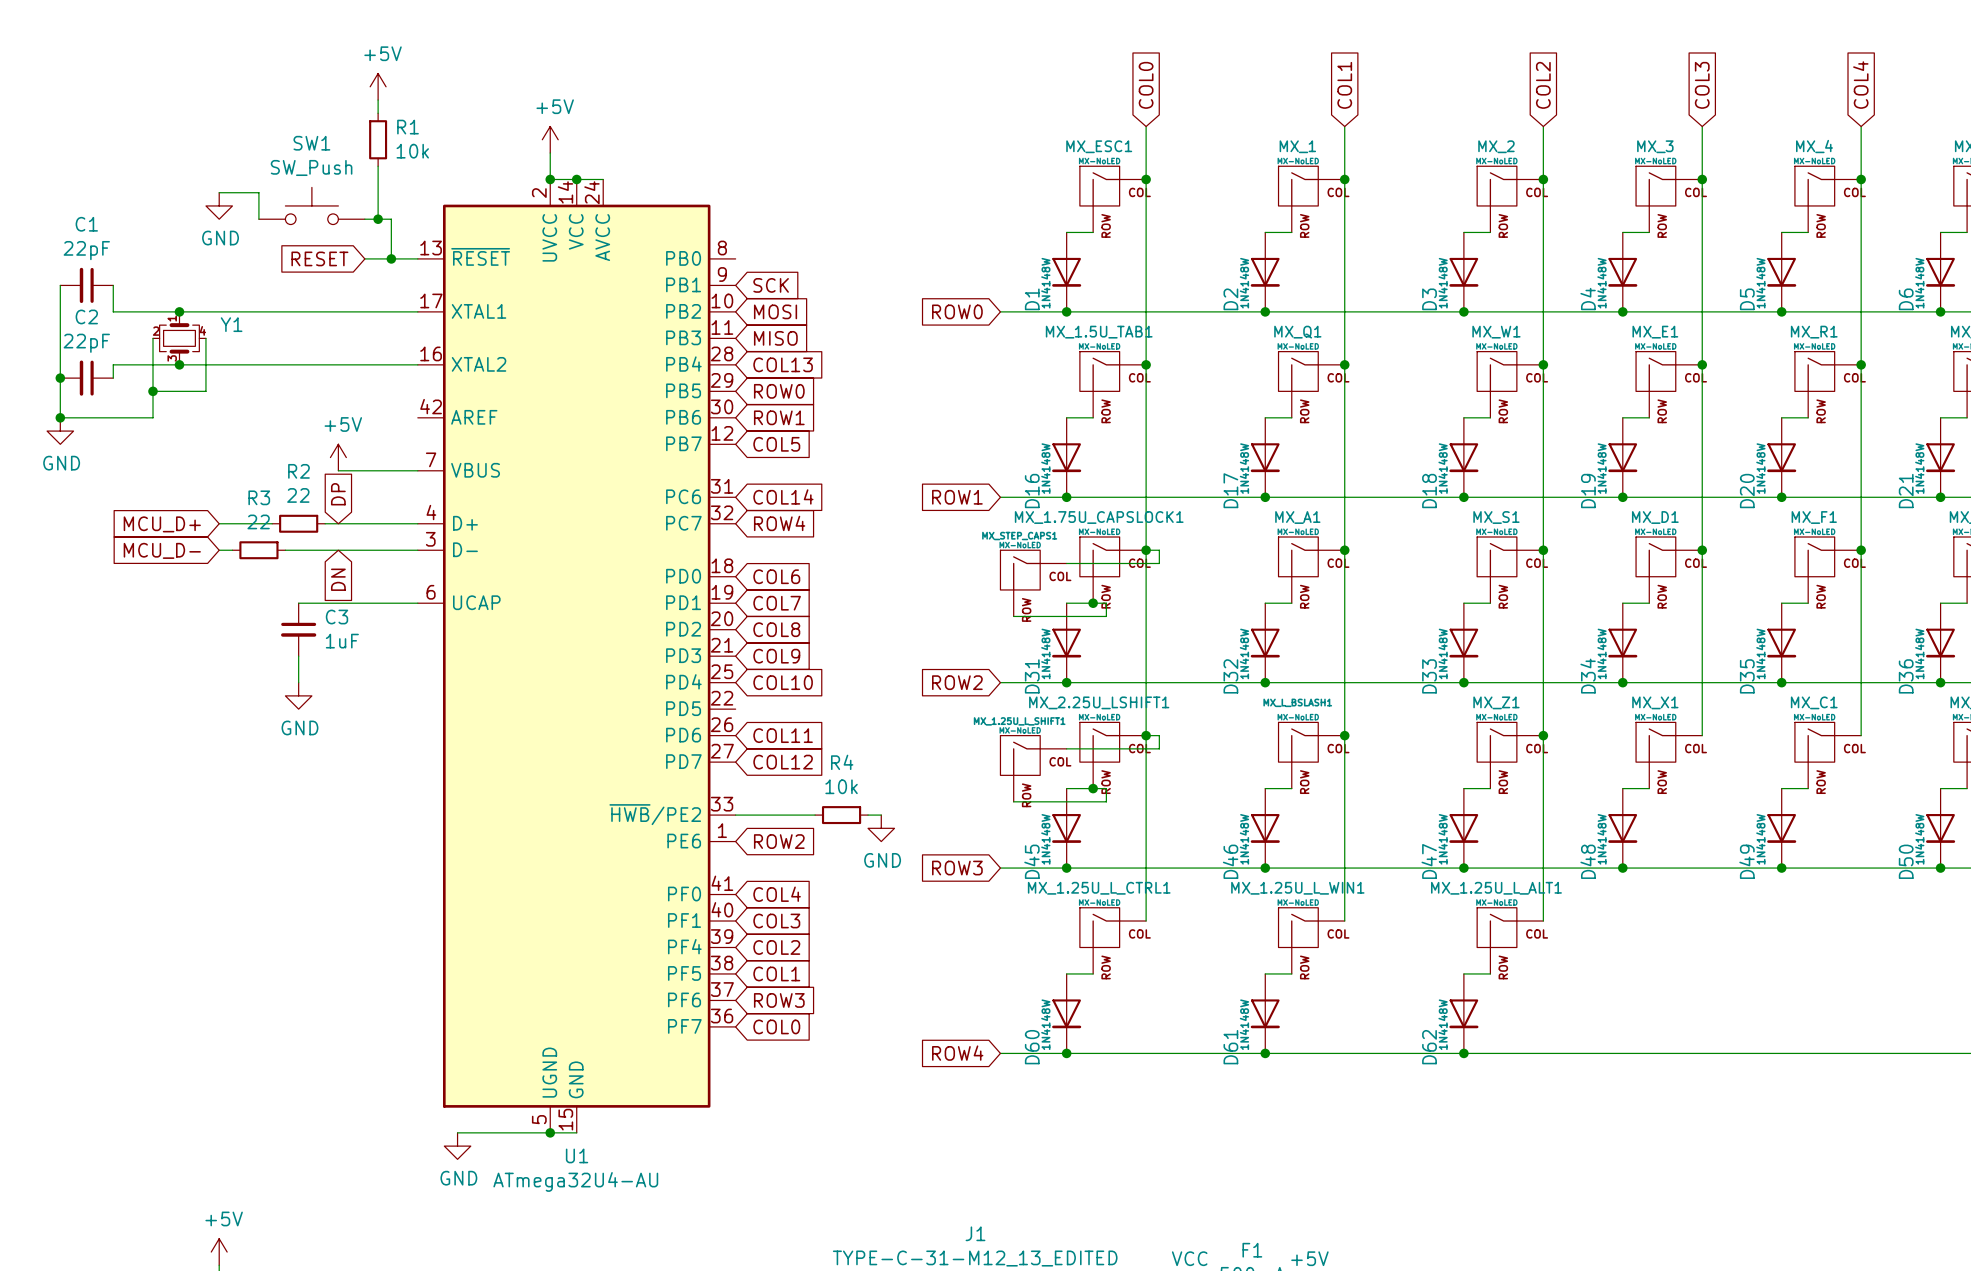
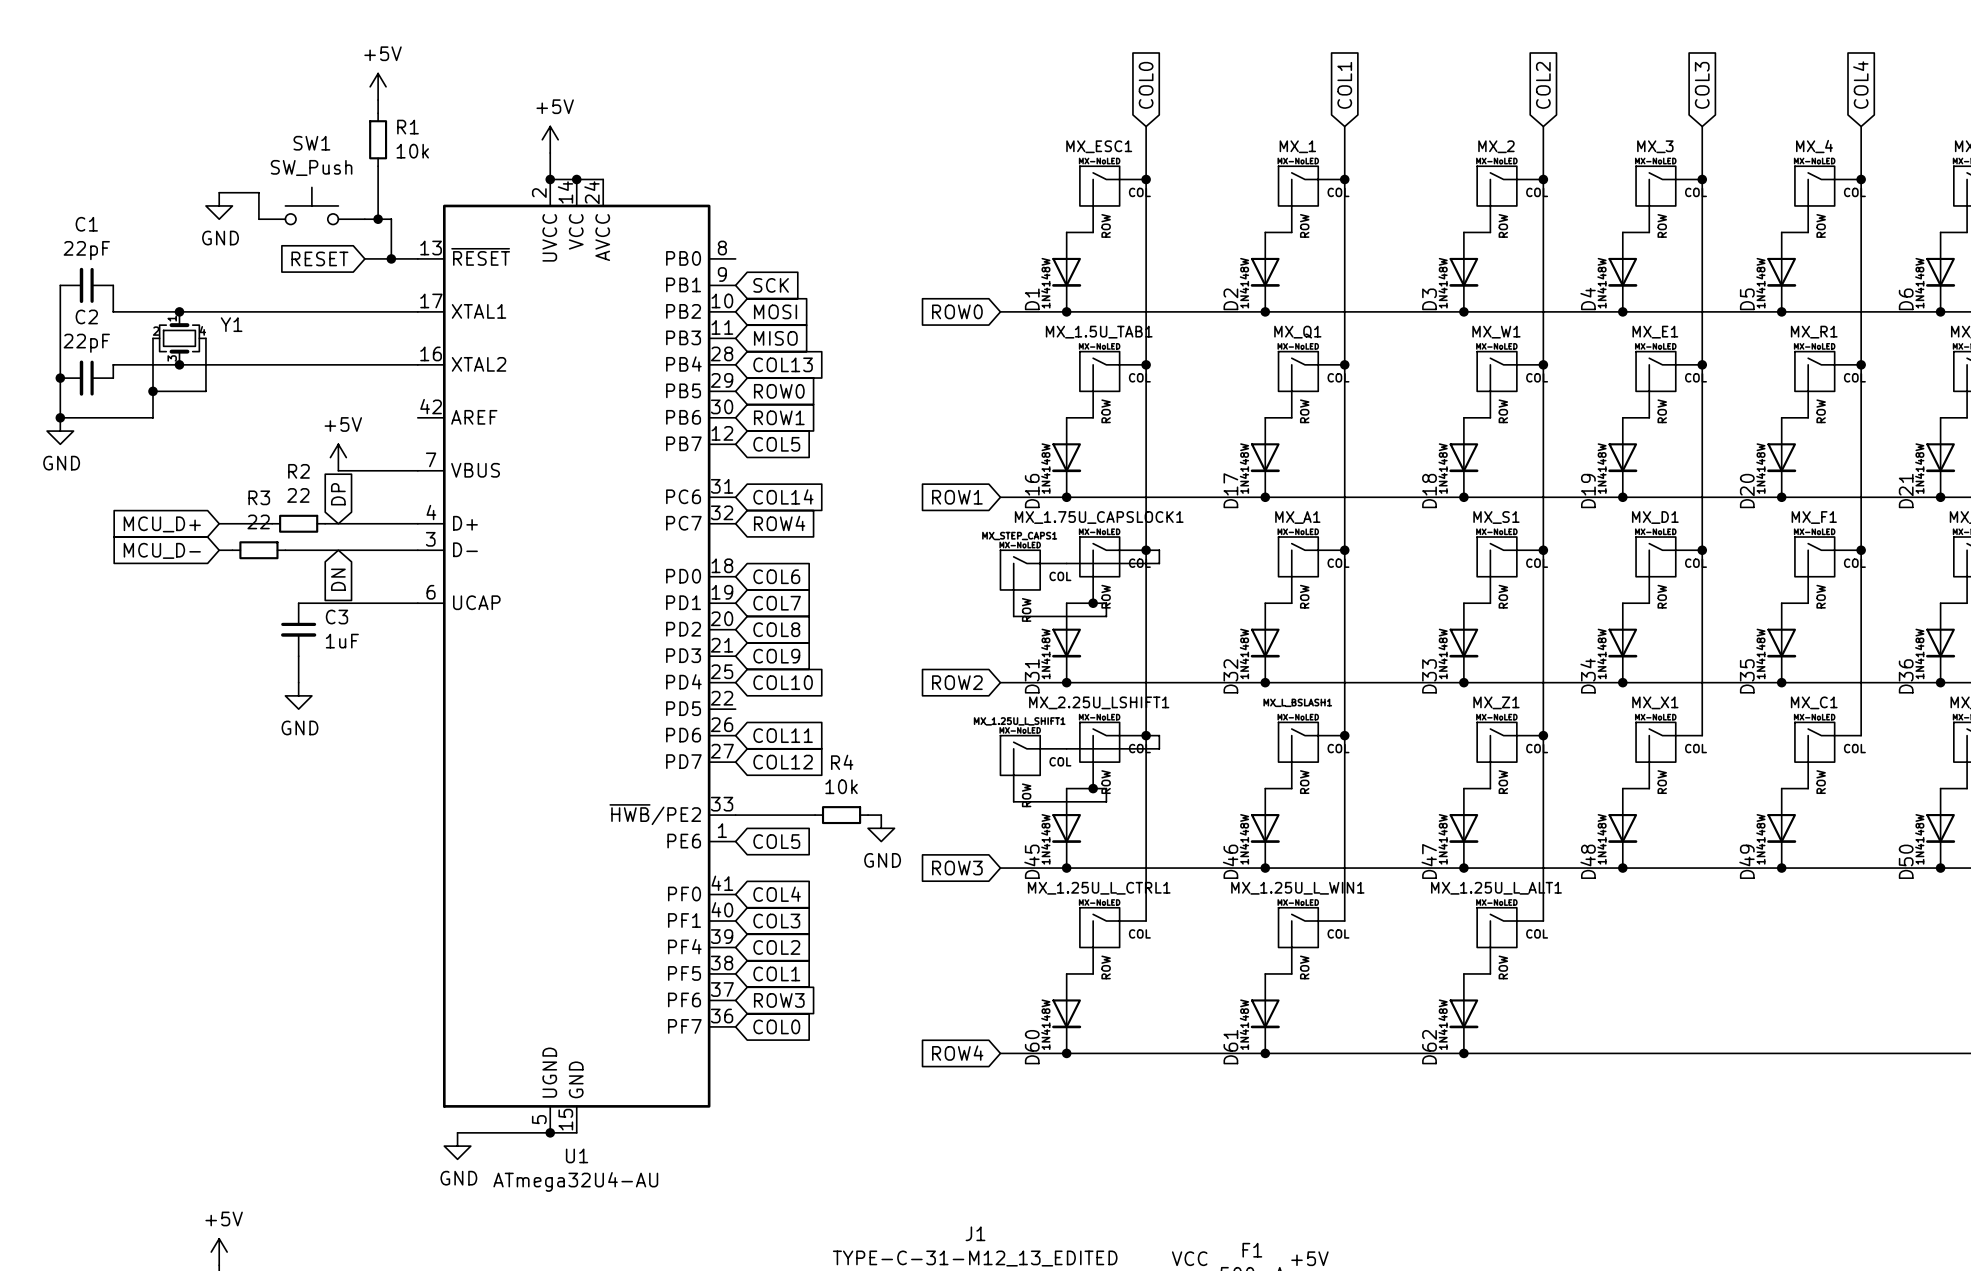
global label: ROW2 (779, 841) -> COL5 (776, 841)

